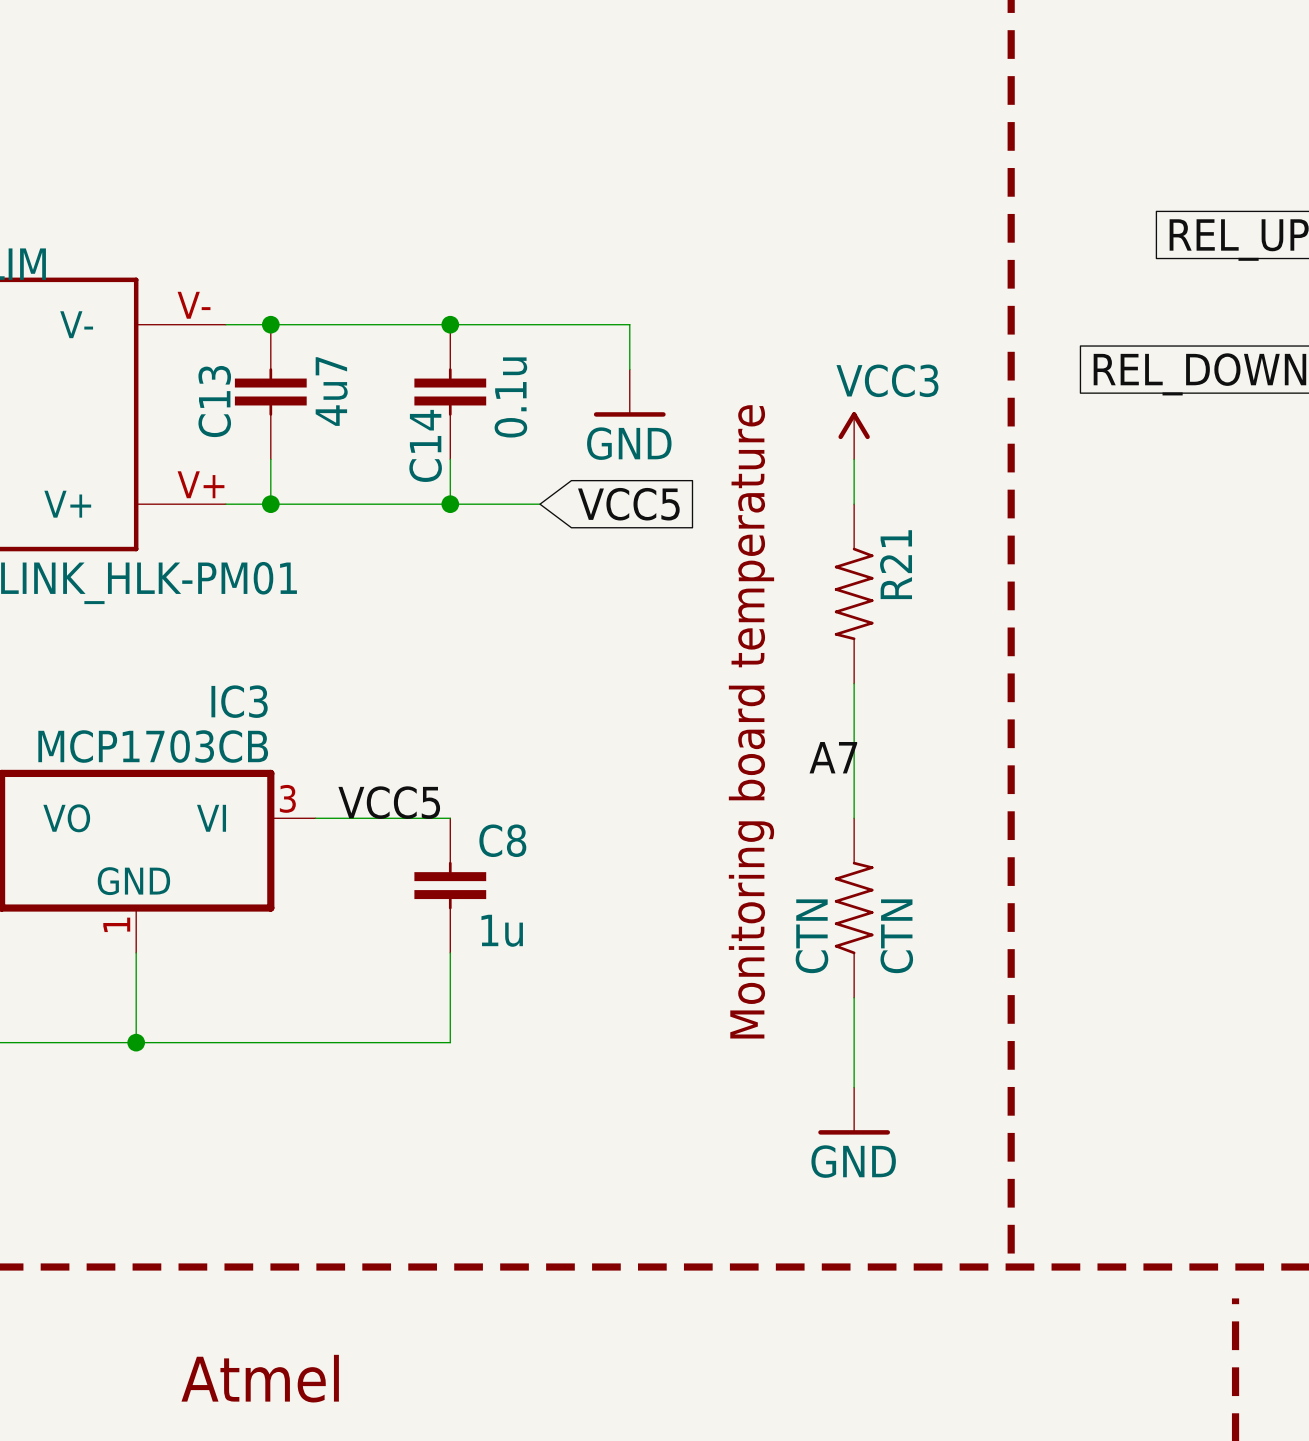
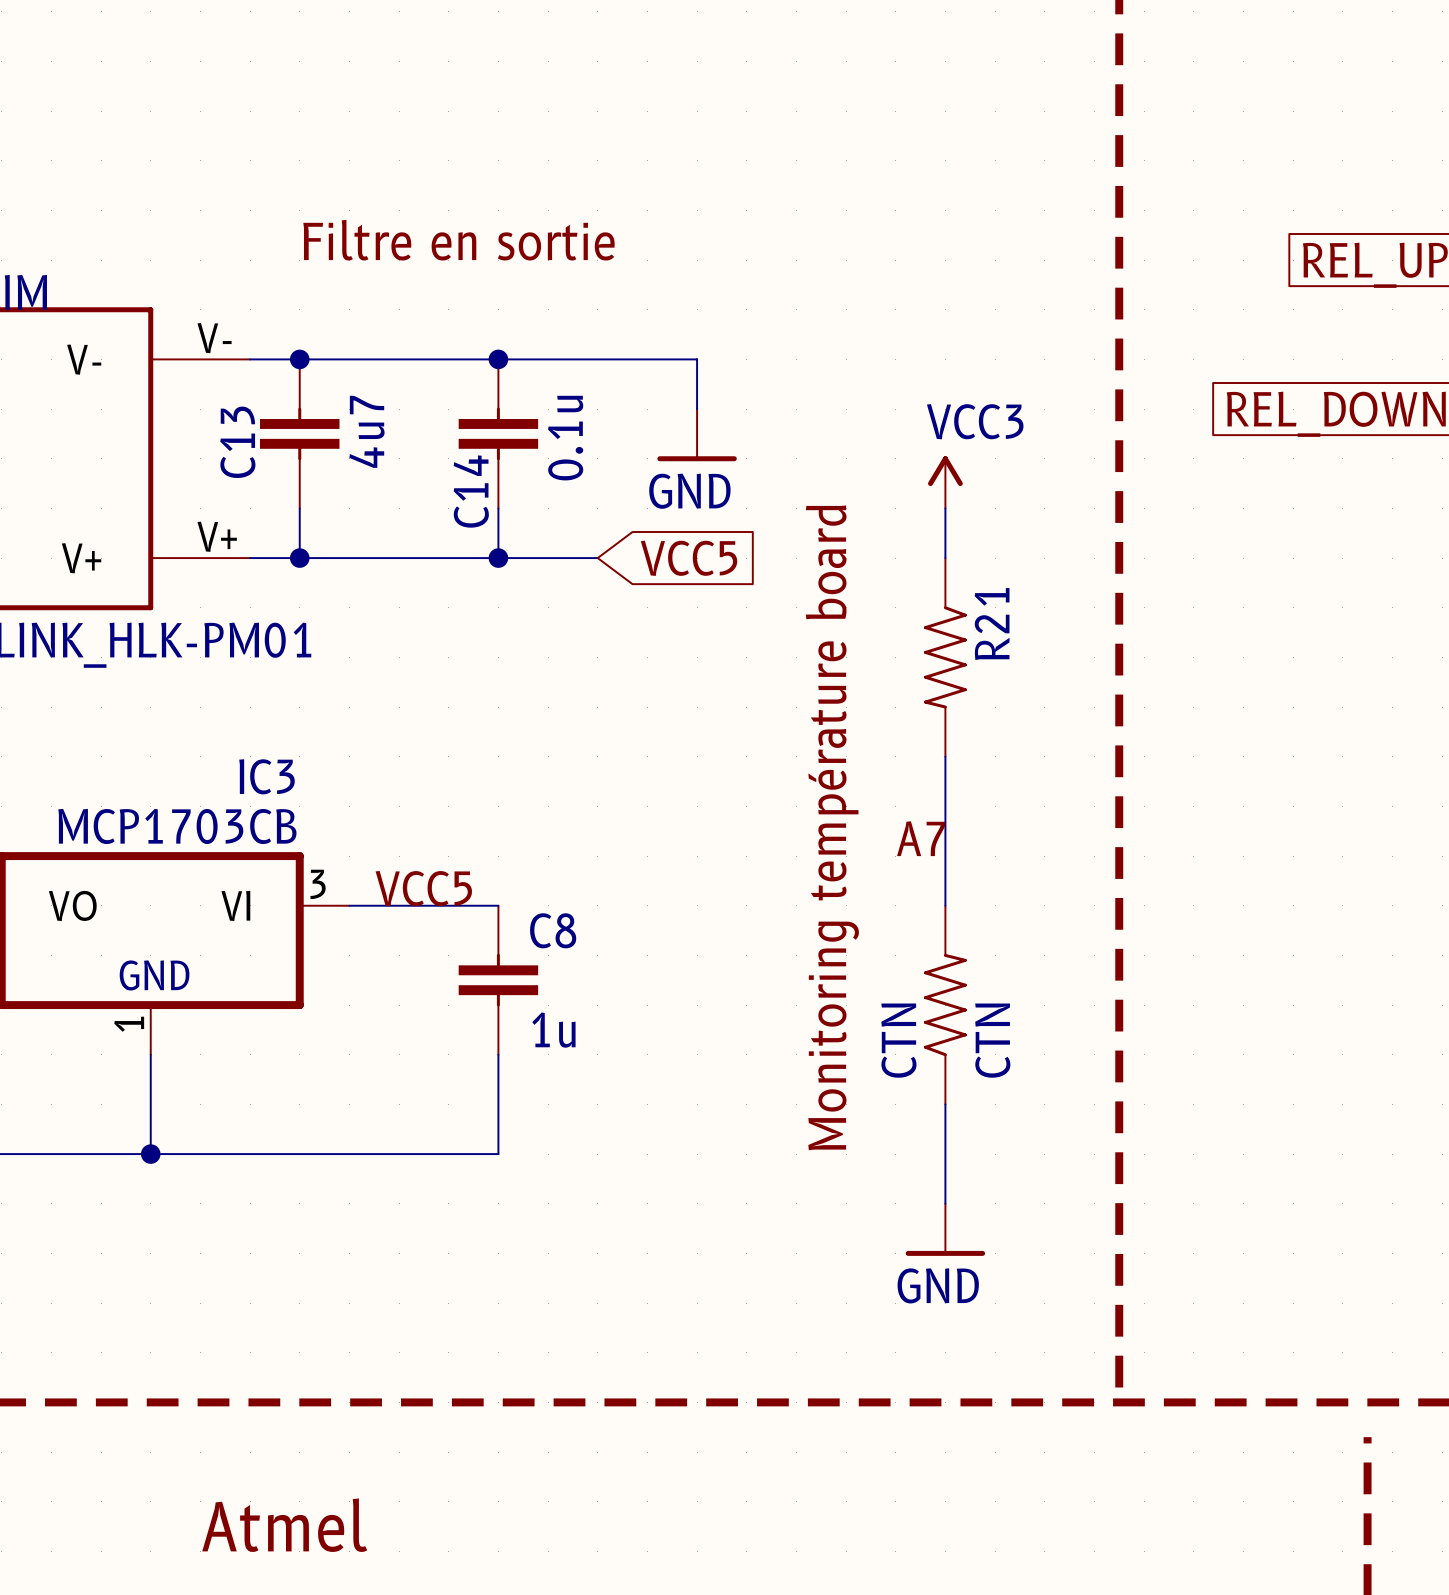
text: none -> Filtre en sortie (458, 240)
text: Monitoring board temperature (751, 721) -> Monitoring température board (832, 827)

